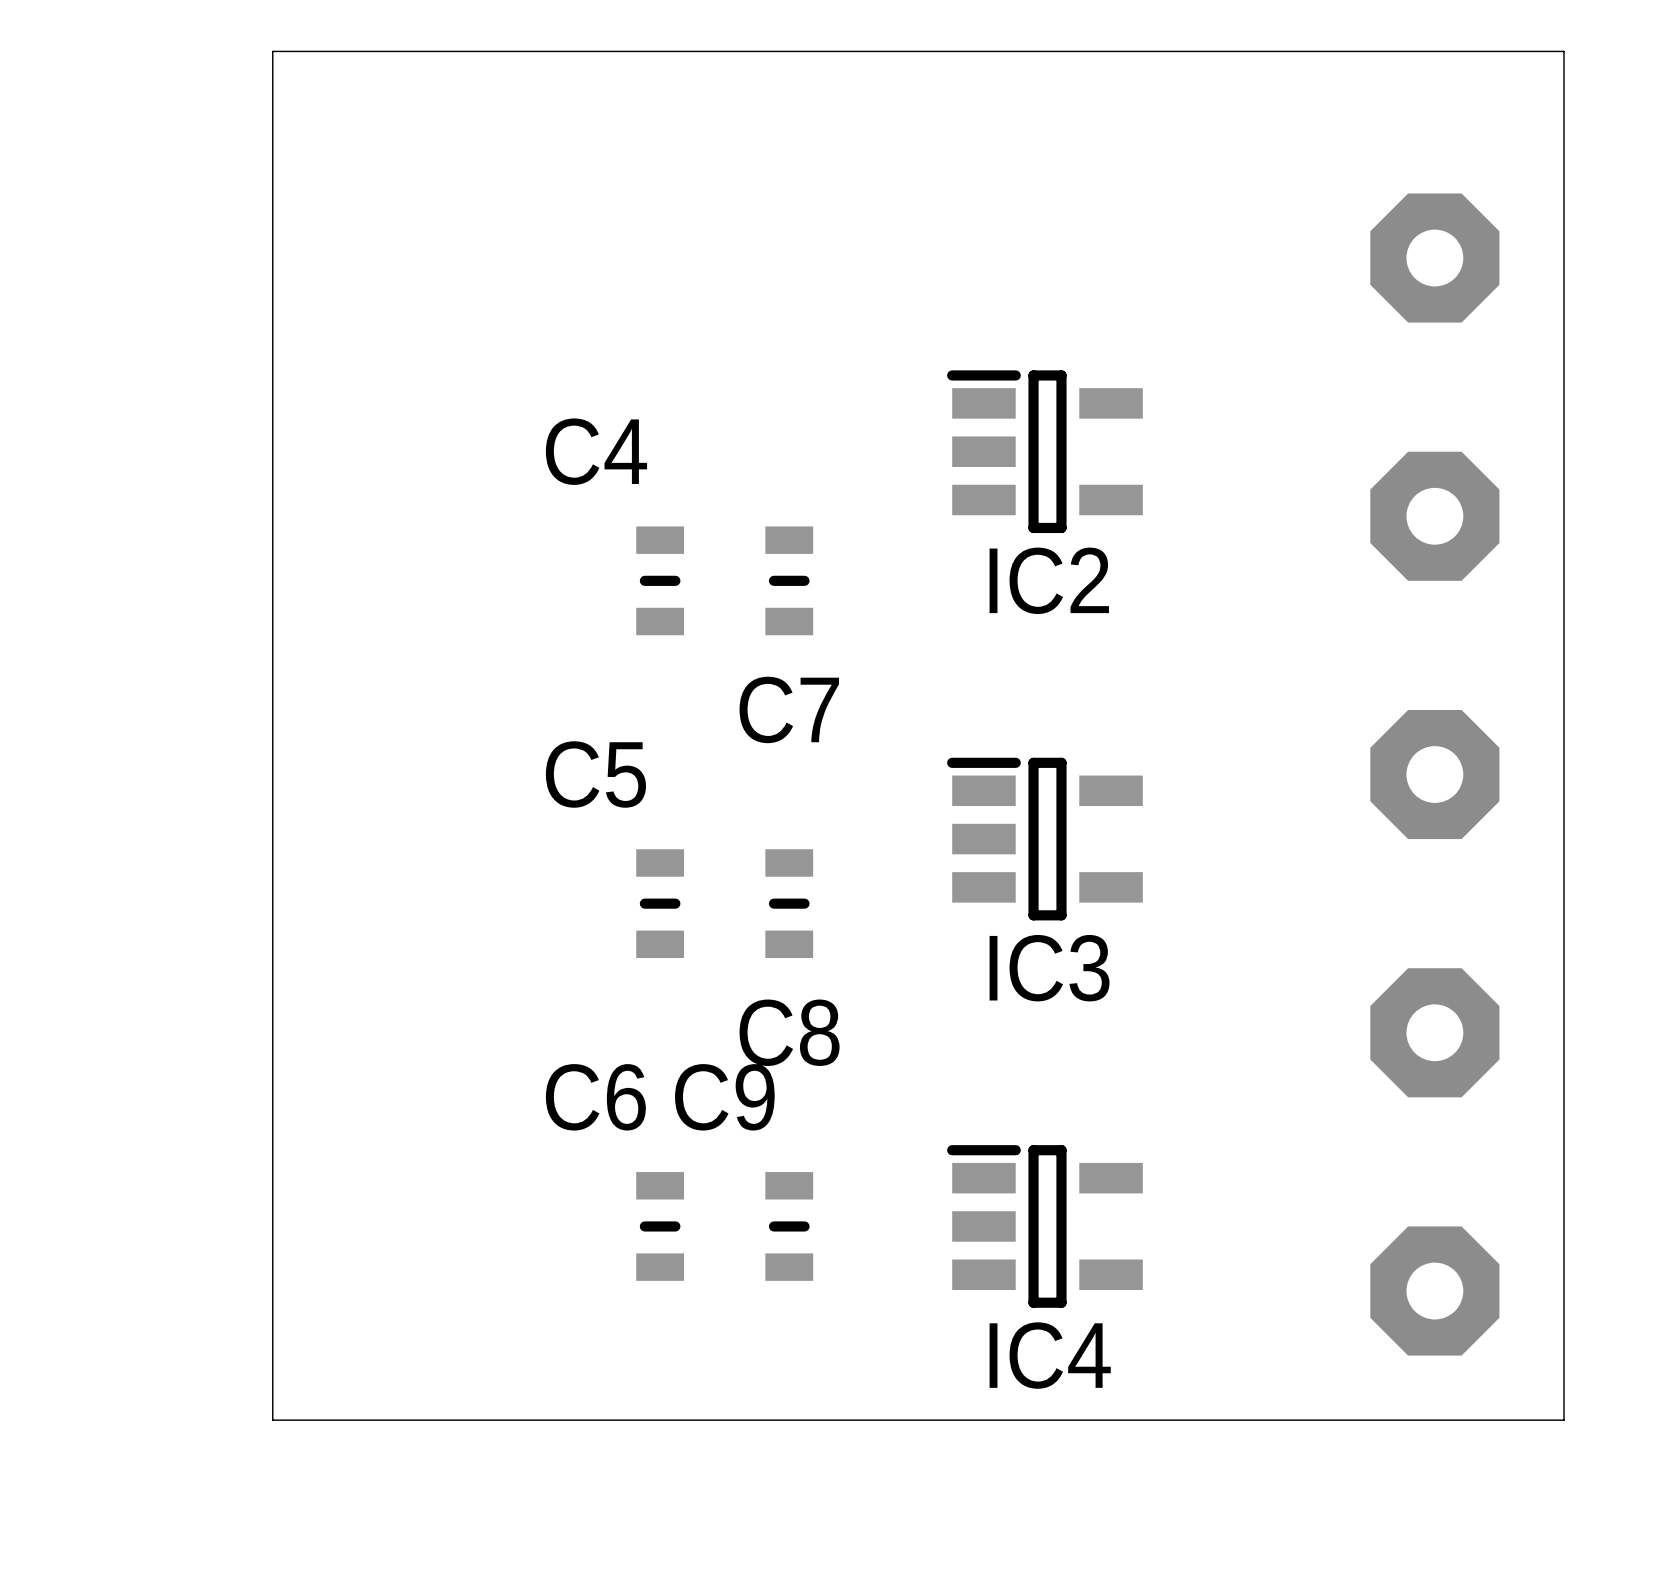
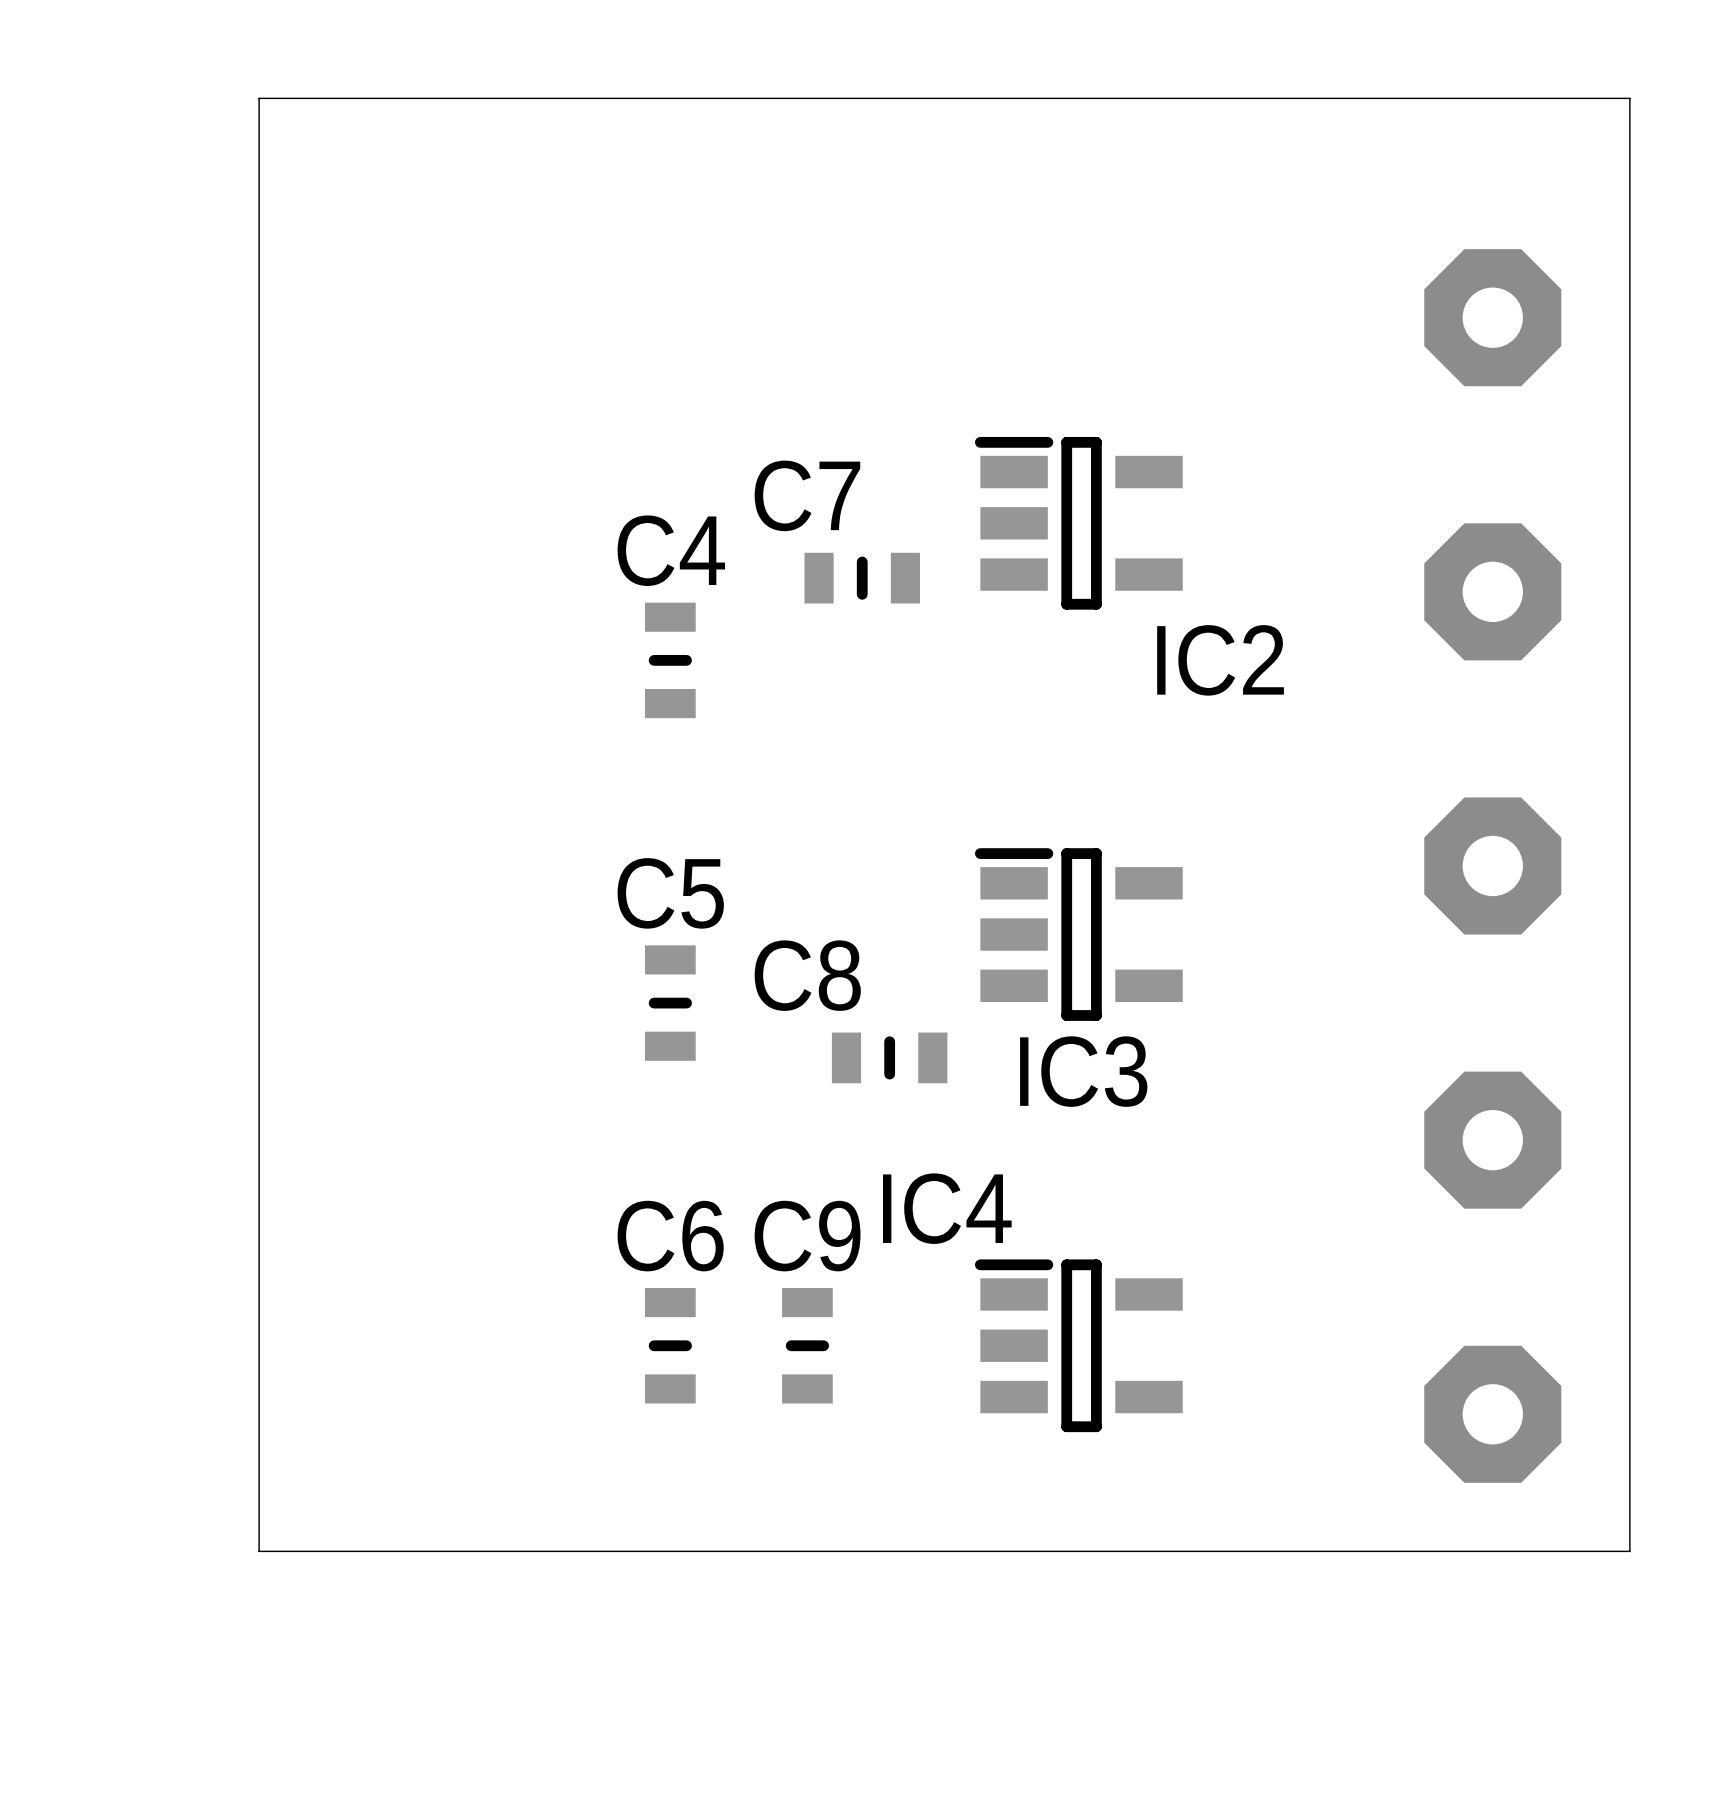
C4 name position: C4 (596, 451) -> C4 (671, 550)
C7 rotation: 0° (789, 580) -> 90° clockwise (862, 578)
C7 position: (789, 580) -> (862, 578)
IC2 name position: IC2 (1049, 580) -> IC2 (1220, 660)
C7 name position: C7 (789, 709) -> C7 (807, 495)
C5 name position: C5 (595, 774) -> C5 (670, 893)
C8 rotation: 0° (789, 903) -> 90° clockwise (889, 1057)
C8 position: (789, 903) -> (889, 1057)
C6 name position: C6 (595, 1097) -> C6 (670, 1236)
C9 name position: C9 (724, 1097) -> C9 (807, 1236)
IC4 name position: IC4 (1050, 1355) -> IC4 (947, 1208)

